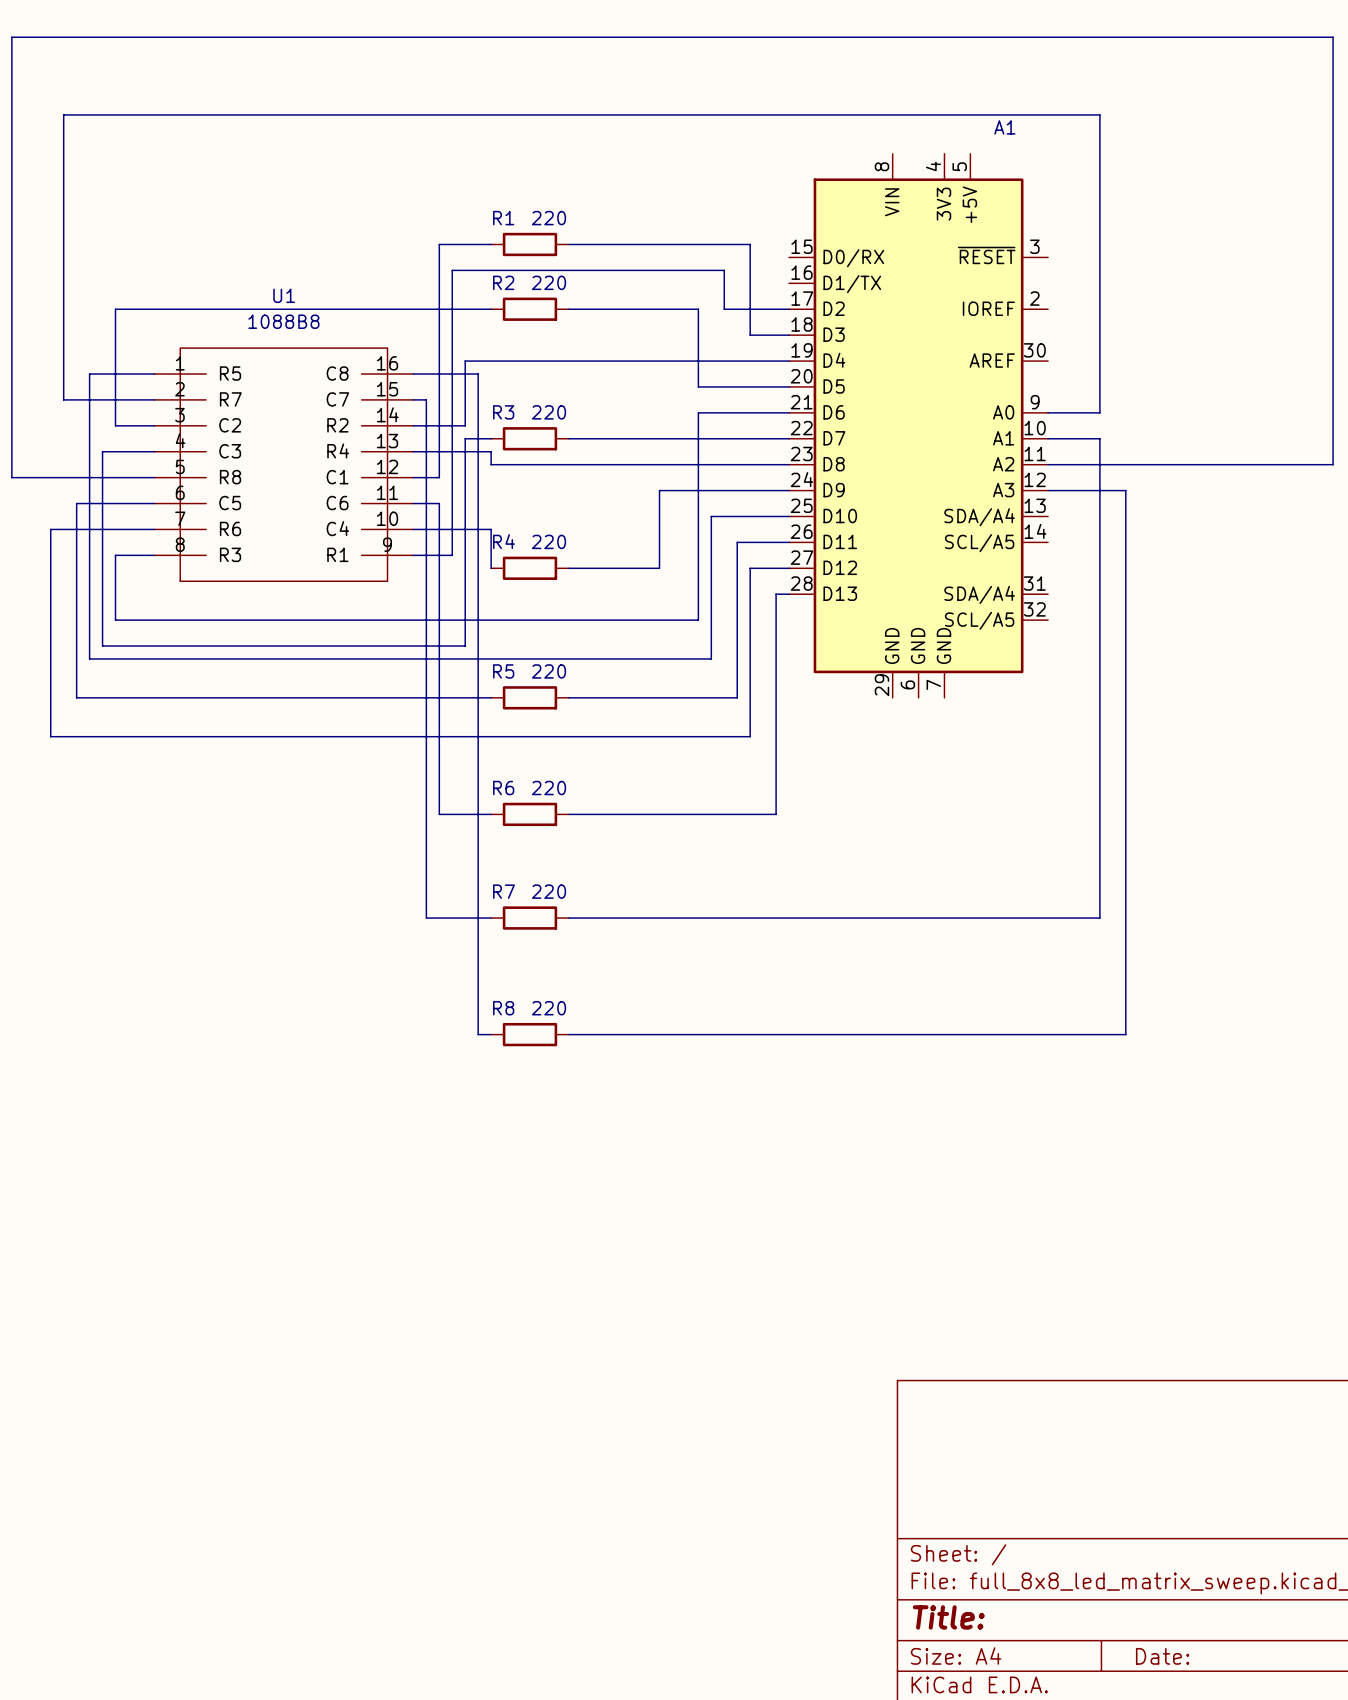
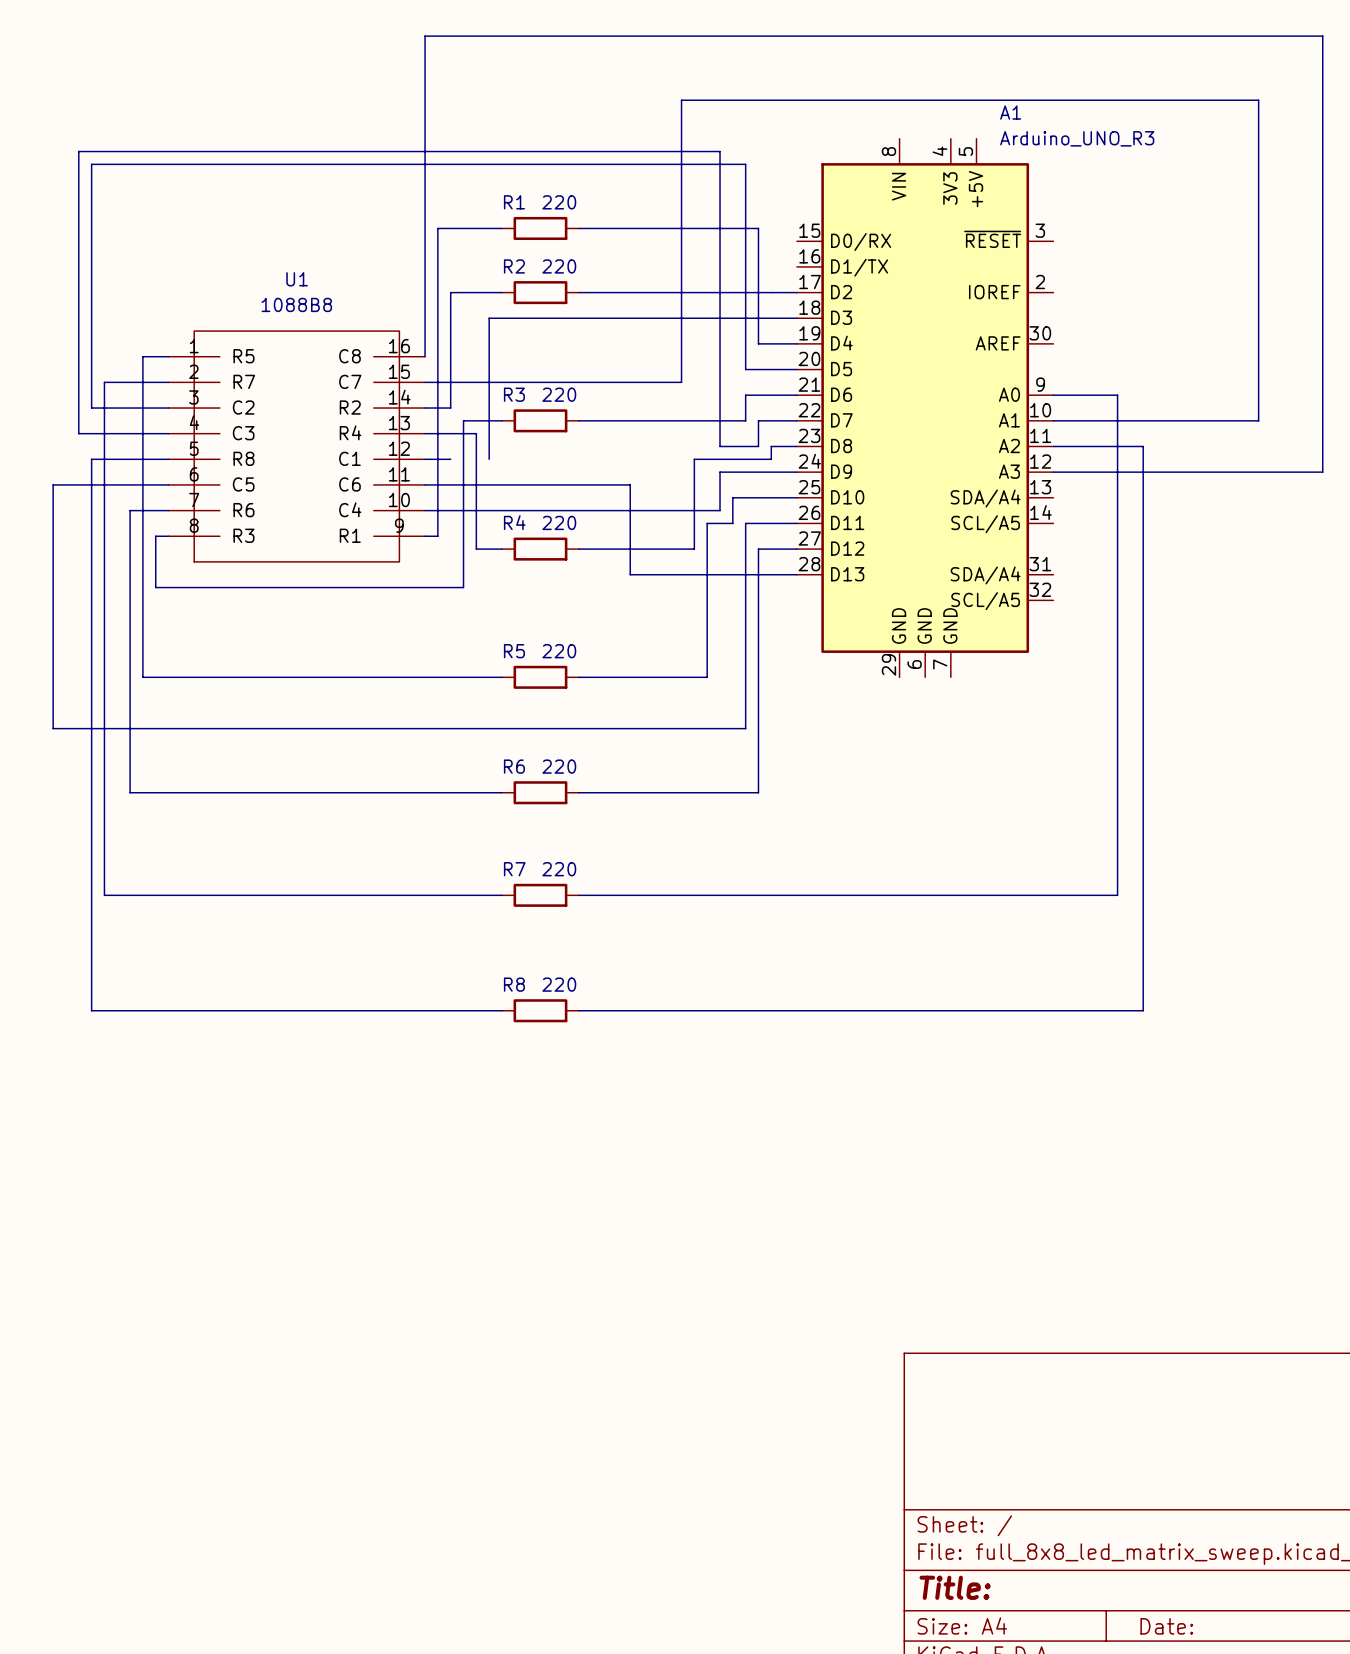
wire: (672, 114) (63, 114) (63, 166) -> (720, 446) (720, 151) (78, 151)
wire: none -> (681, 100) (681, 382) (437, 382) (437, 228) (450, 228)
wire: (1099, 114) (1099, 412) -> (1104, 100) (1258, 100) (1258, 420) (1104, 420)
A1 value: none -> Arduino_UNO_R3 (1077, 138)
wire: (439, 244) (439, 309) (115, 309) (115, 425) -> (745, 369) (745, 164) (91, 164) (91, 408) (130, 408)
wire: (698, 309) (698, 386) (737, 386) -> (707, 292) (732, 292)
wire: (724, 309) (724, 270) (452, 270) (452, 438) -> none
wire: (750, 361) (465, 361) (465, 425) (439, 425) (439, 477) -> (758, 343) (758, 318) (489, 318) (489, 356)
wire: (128, 374) (89, 374) (89, 399) (63, 399) -> (117, 433) (78, 433) (78, 382)
wire: (413, 374) (478, 374) -> (425, 356) (425, 36) (1322, 36) (1322, 472) (1130, 472)
wire: (737, 412) (698, 412) (698, 542) -> none
wire: (465, 438) (465, 451) (491, 451) (491, 464) (711, 464) -> (476, 420) (463, 420)
wire: (737, 438) (750, 438) -> (745, 420) (745, 395)
wire: (1099, 438) (1099, 918) -> (1104, 395) (1117, 395) (1117, 895) (1104, 895)
wire: (102, 451) (102, 646) (465, 646) (465, 568) -> none
wire: (750, 464) (763, 464) -> (758, 446) (758, 420)
wire: (1138, 464) (1333, 464) (1333, 37) (11, 37) (11, 477) (76, 477) -> (745, 677) (745, 728) (53, 728) (53, 484) (91, 484) (91, 459)
wire: (478, 477) (478, 1034) -> (91, 677) (91, 1010) (489, 1010)
wire: (711, 490) (659, 490) (659, 568) -> (771, 446) (771, 459) (694, 459) (694, 549) (668, 549)
wire: none -> (720, 472) (720, 497)
wire: (1125, 490) (1125, 1034) -> (1143, 446) (1143, 1010) (1130, 1010)
wire: (439, 503) (439, 814) -> (450, 484) (630, 484) (630, 574) (784, 574)
wire: (711, 516) (724, 516) -> (707, 523) (732, 523) (732, 497)
wire: (115, 529) (50, 529) (50, 736) (750, 736) -> none
wire: (491, 529) (491, 568) -> (476, 549) (501, 549)
wire: (711, 529) (711, 658) (89, 658) -> (720, 510) (501, 510)
wire: (115, 555) (141, 555) -> (130, 536) (130, 510)
wire: none -> (155, 536) (155, 587) (463, 587) (463, 536)
wire: (452, 555) (426, 555) (426, 918) -> (104, 638) (104, 895) (437, 895)
wire: (776, 594) (776, 814) (750, 814) -> (758, 715) (758, 792)
wire: (115, 620) (698, 620) -> (130, 600) (130, 792) (450, 792)
wire: (76, 697) (128, 697) -> (142, 356) (142, 677)
wire: (698, 697) (737, 697) -> (707, 677) (707, 600)

